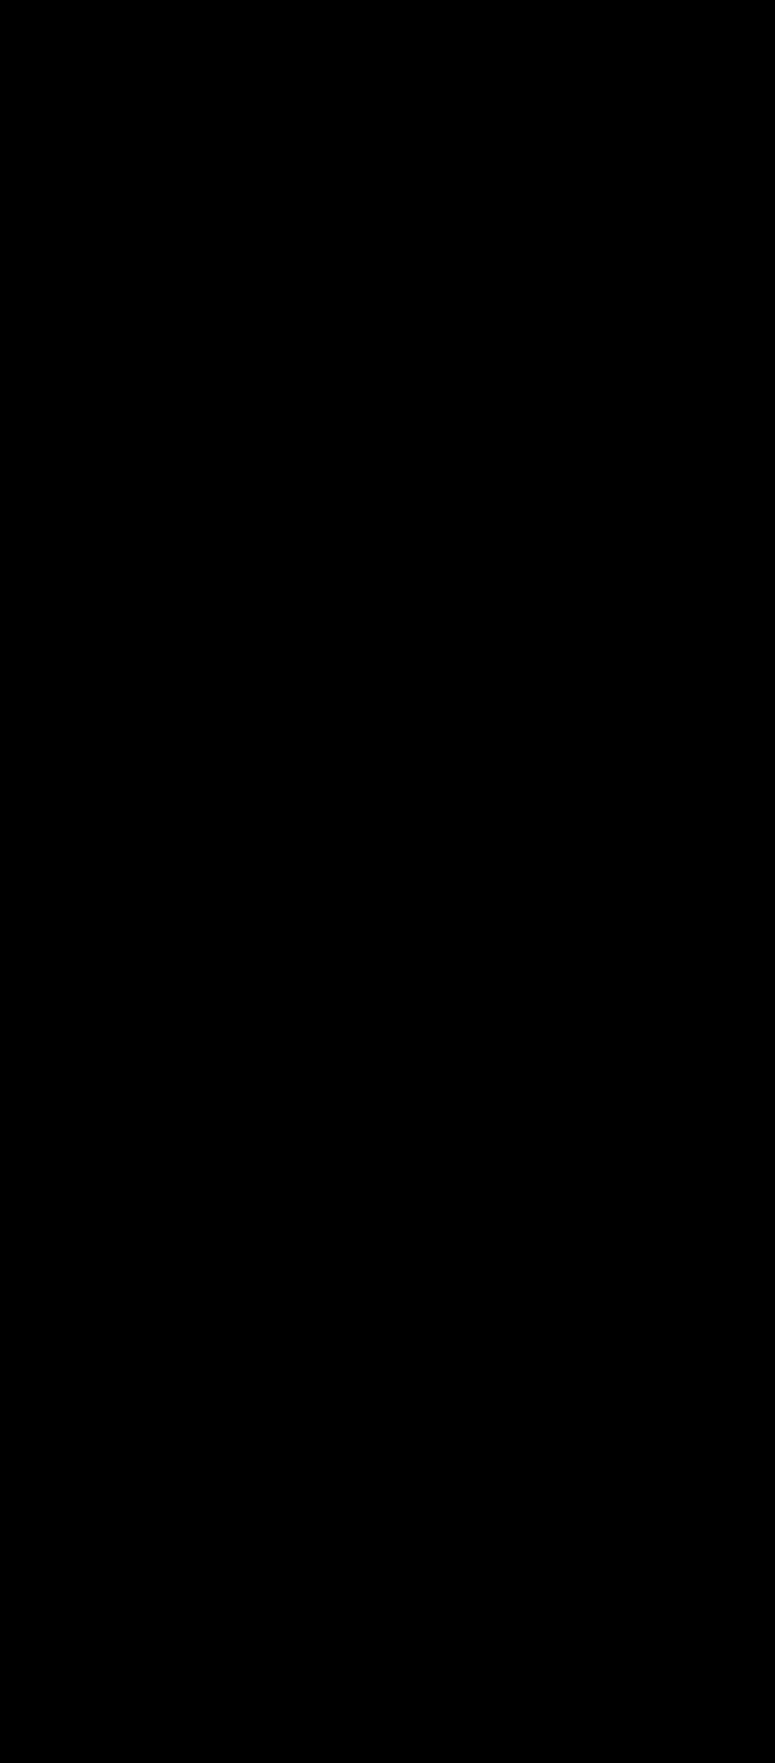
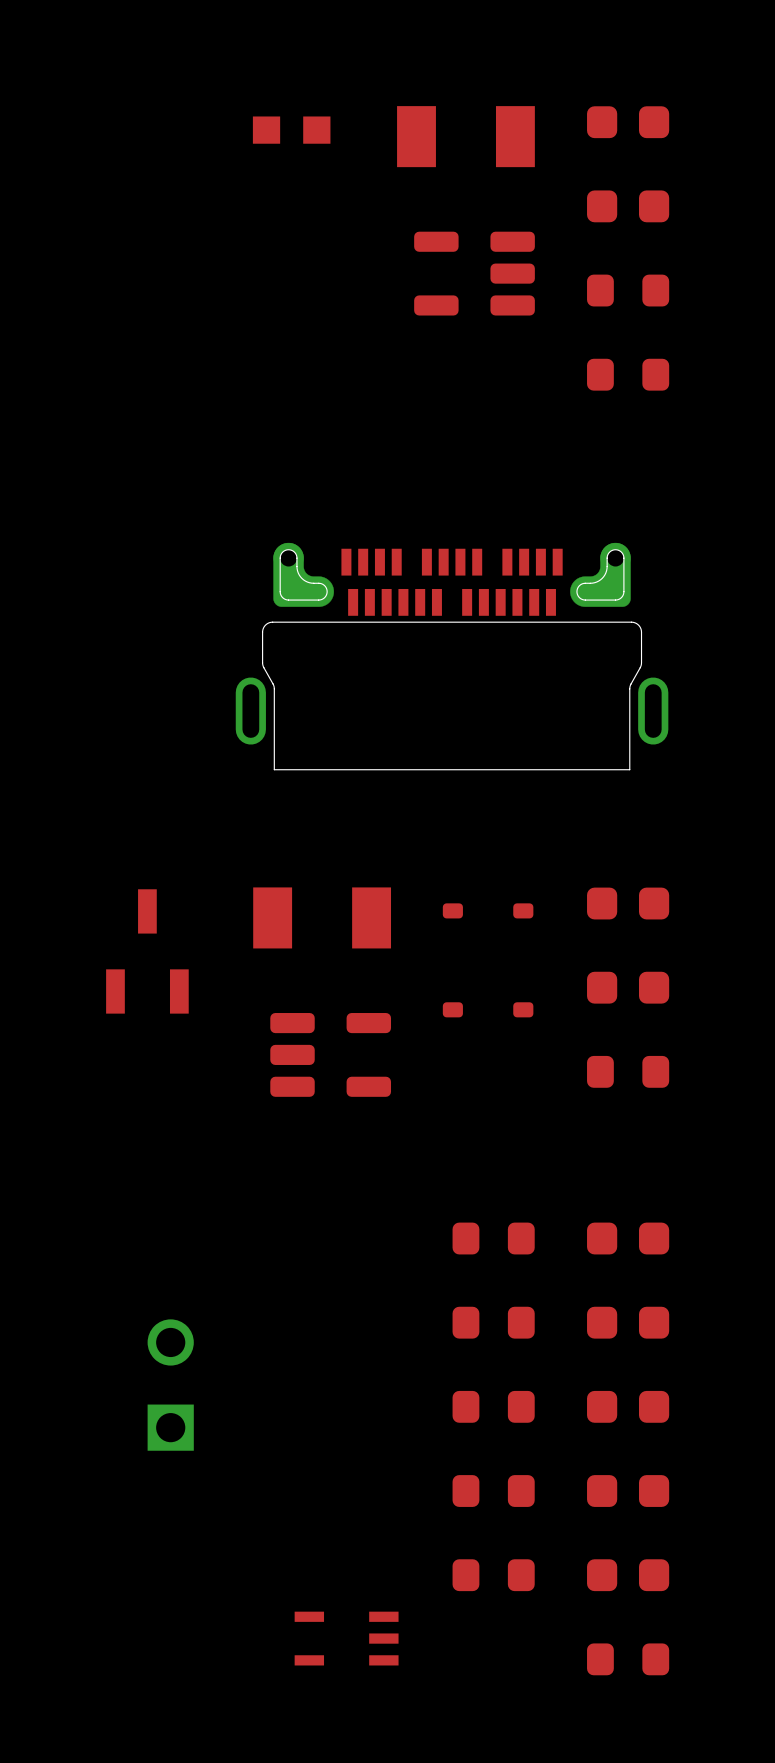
part: none -> (628, 122)
part: none -> (291, 130)
part: none -> (465, 136)
part: none -> (628, 206)
part: none -> (474, 273)
part: none -> (628, 290)
part: none -> (628, 374)
part: none -> (452, 656)
part: none -> (628, 903)
part: none -> (488, 910)
part: none -> (322, 917)
part: none -> (147, 951)
part: none -> (628, 987)
part: none -> (488, 1009)
part: none -> (330, 1054)
part: none -> (628, 1071)
part: none -> (493, 1238)
part: none -> (628, 1238)
part: none -> (493, 1322)
part: none -> (628, 1322)
part: none -> (170, 1385)
part: none -> (493, 1406)
part: none -> (628, 1406)
part: none -> (493, 1491)
part: none -> (628, 1491)
part: none -> (493, 1575)
part: none -> (628, 1575)
part: none -> (346, 1638)
part: none -> (628, 1659)

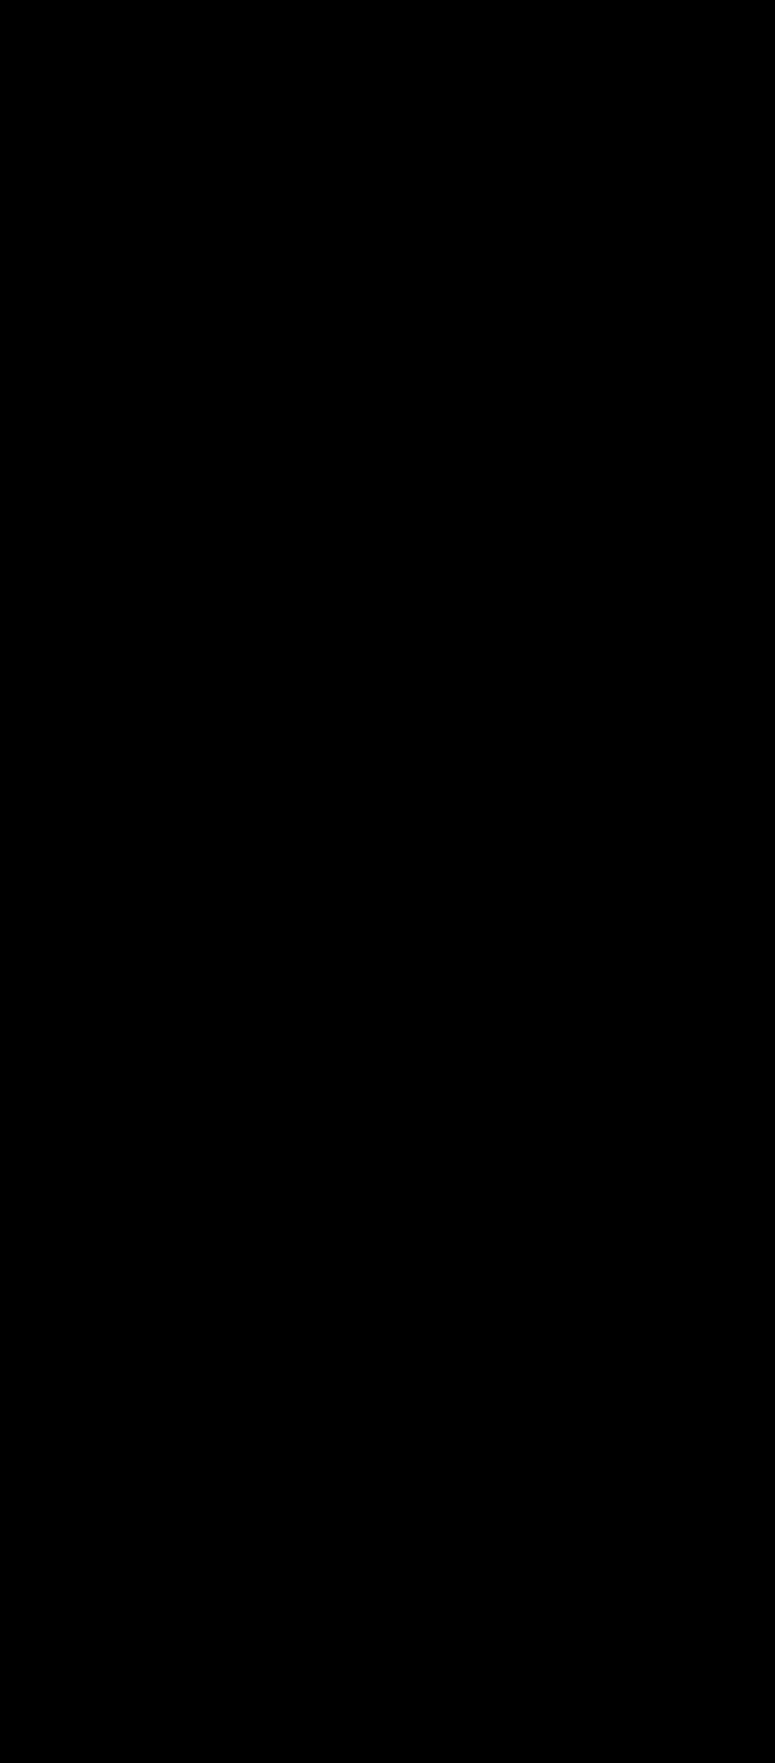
part: (628, 122) -> none
part: (291, 130) -> none
part: (465, 136) -> none
part: (628, 206) -> none
part: (474, 273) -> none
part: (628, 290) -> none
part: (628, 374) -> none
part: (452, 656) -> none
part: (628, 903) -> none
part: (488, 910) -> none
part: (322, 917) -> none
part: (147, 951) -> none
part: (628, 987) -> none
part: (488, 1009) -> none
part: (330, 1054) -> none
part: (628, 1071) -> none
part: (493, 1238) -> none
part: (628, 1238) -> none
part: (493, 1322) -> none
part: (628, 1322) -> none
part: (170, 1385) -> none
part: (493, 1406) -> none
part: (628, 1406) -> none
part: (493, 1491) -> none
part: (628, 1491) -> none
part: (493, 1575) -> none
part: (628, 1575) -> none
part: (346, 1638) -> none
part: (628, 1659) -> none

